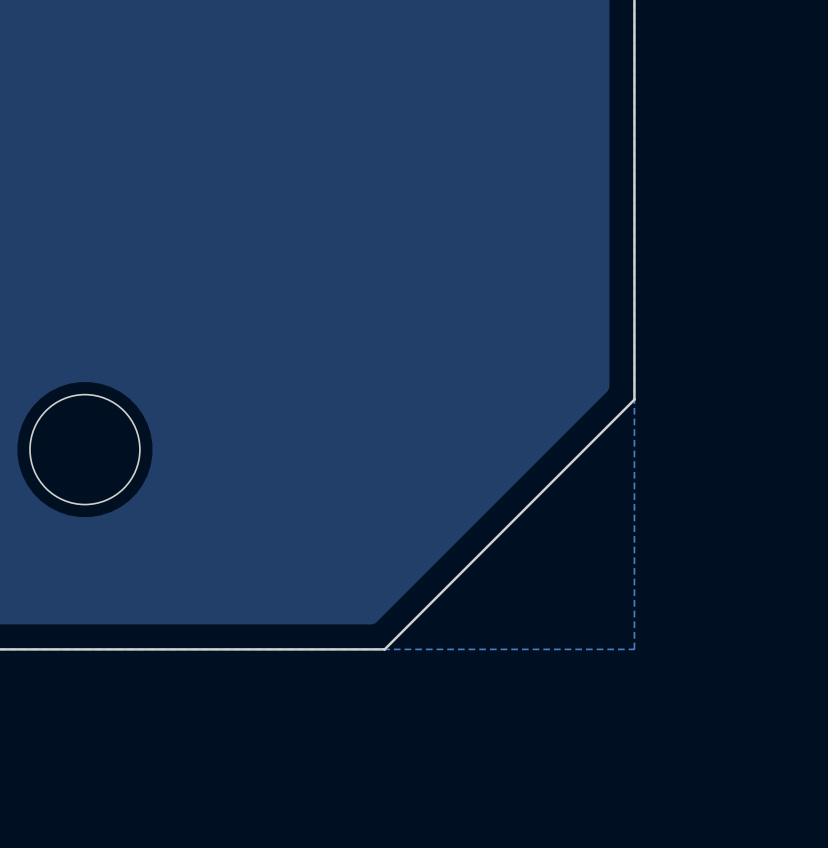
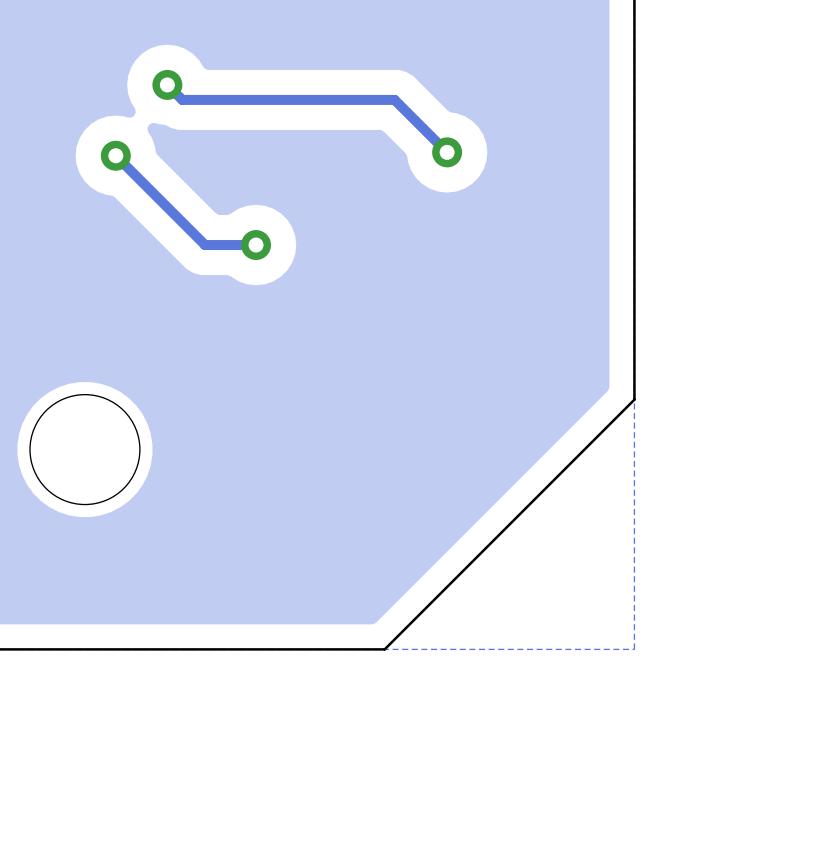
track: none -> (167, 84) (182, 99) (394, 99) (447, 152)
via: none -> (167, 84)
via: none -> (447, 152)
track: none -> (115, 155) (205, 245) (256, 245)
via: none -> (115, 155)
via: none -> (256, 245)

